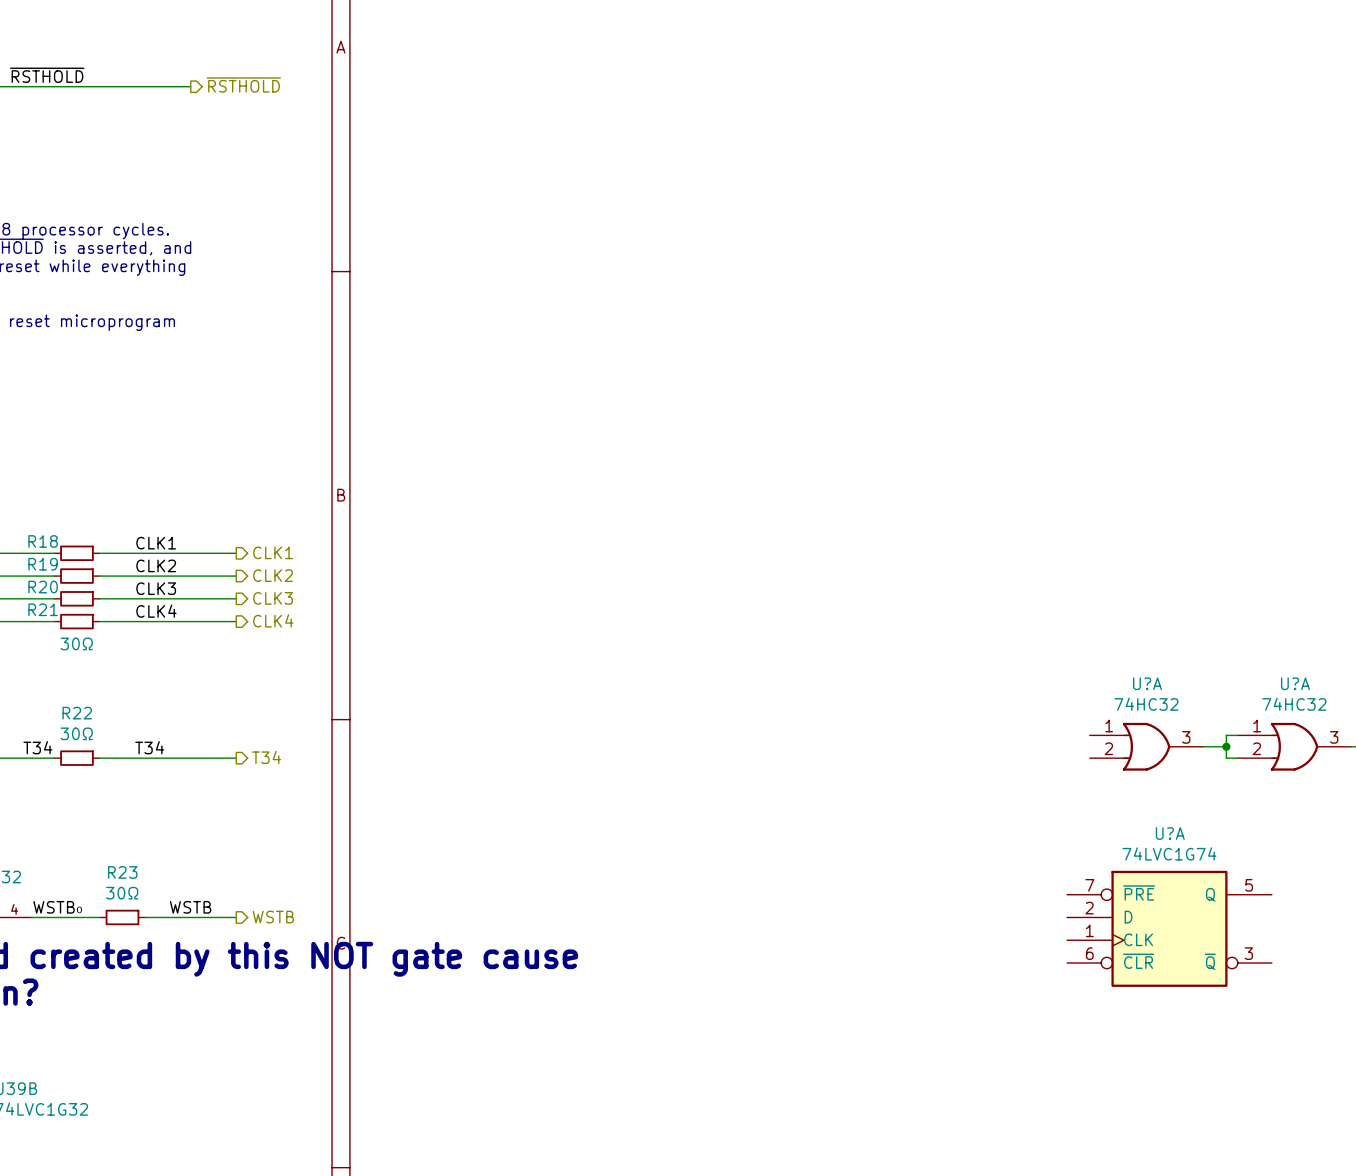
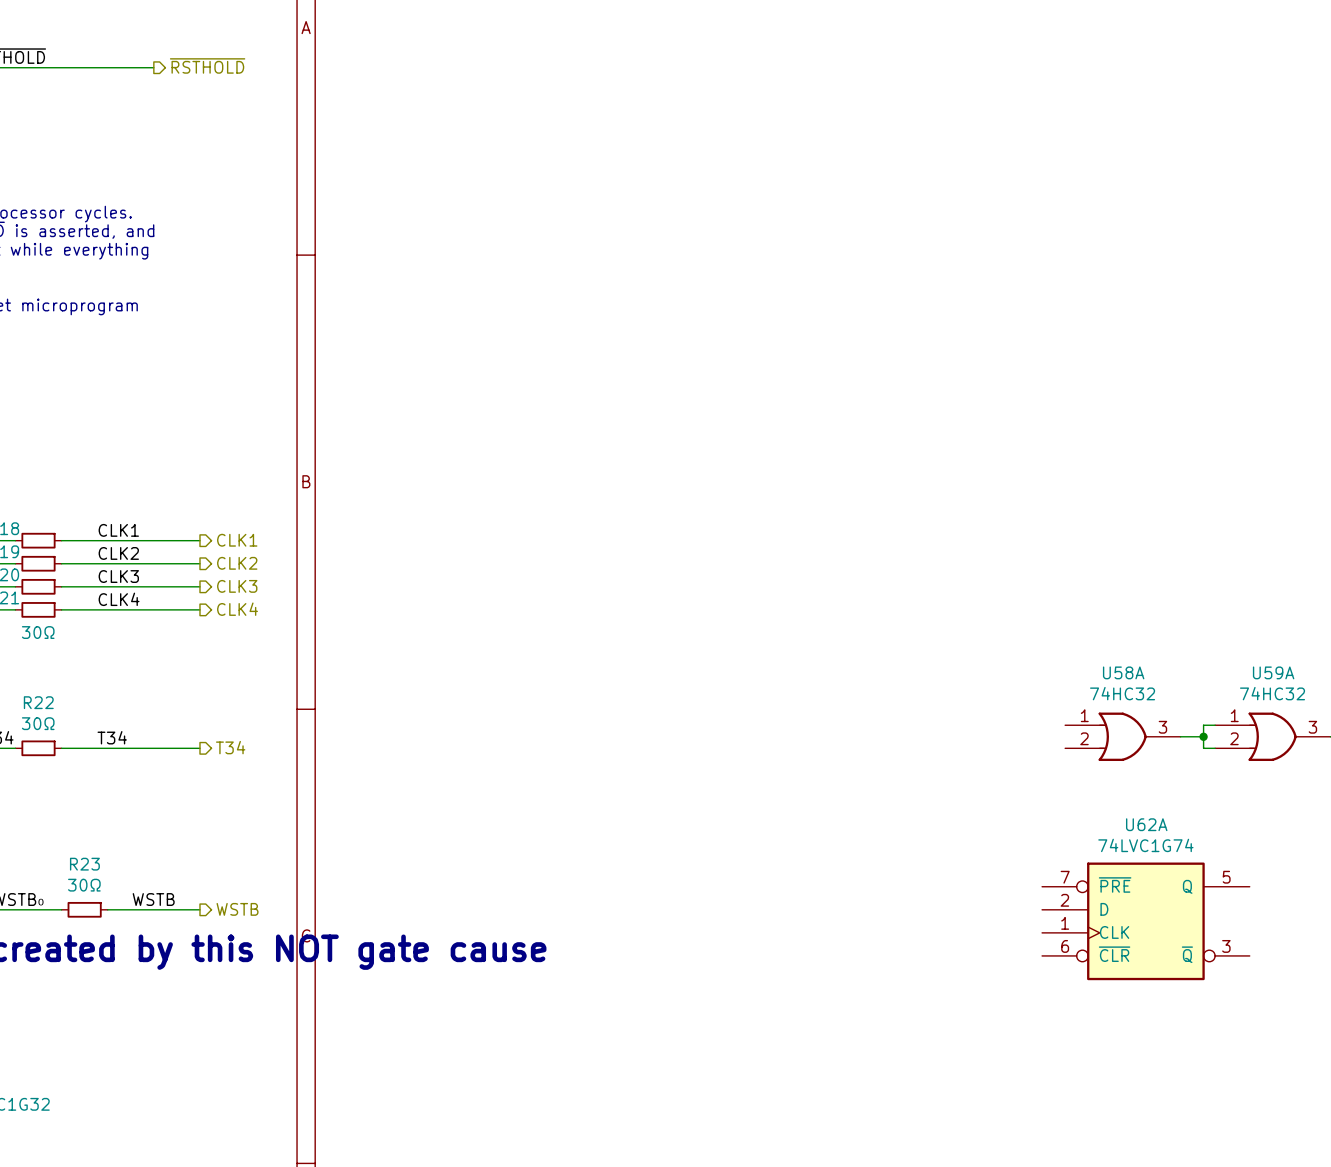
U?A name: U?A (1147, 683) -> U58A (1123, 672)
U?A name: U?A (1295, 683) -> U59A (1273, 672)
U?A name: U?A (1170, 833) -> U62A (1146, 824)

